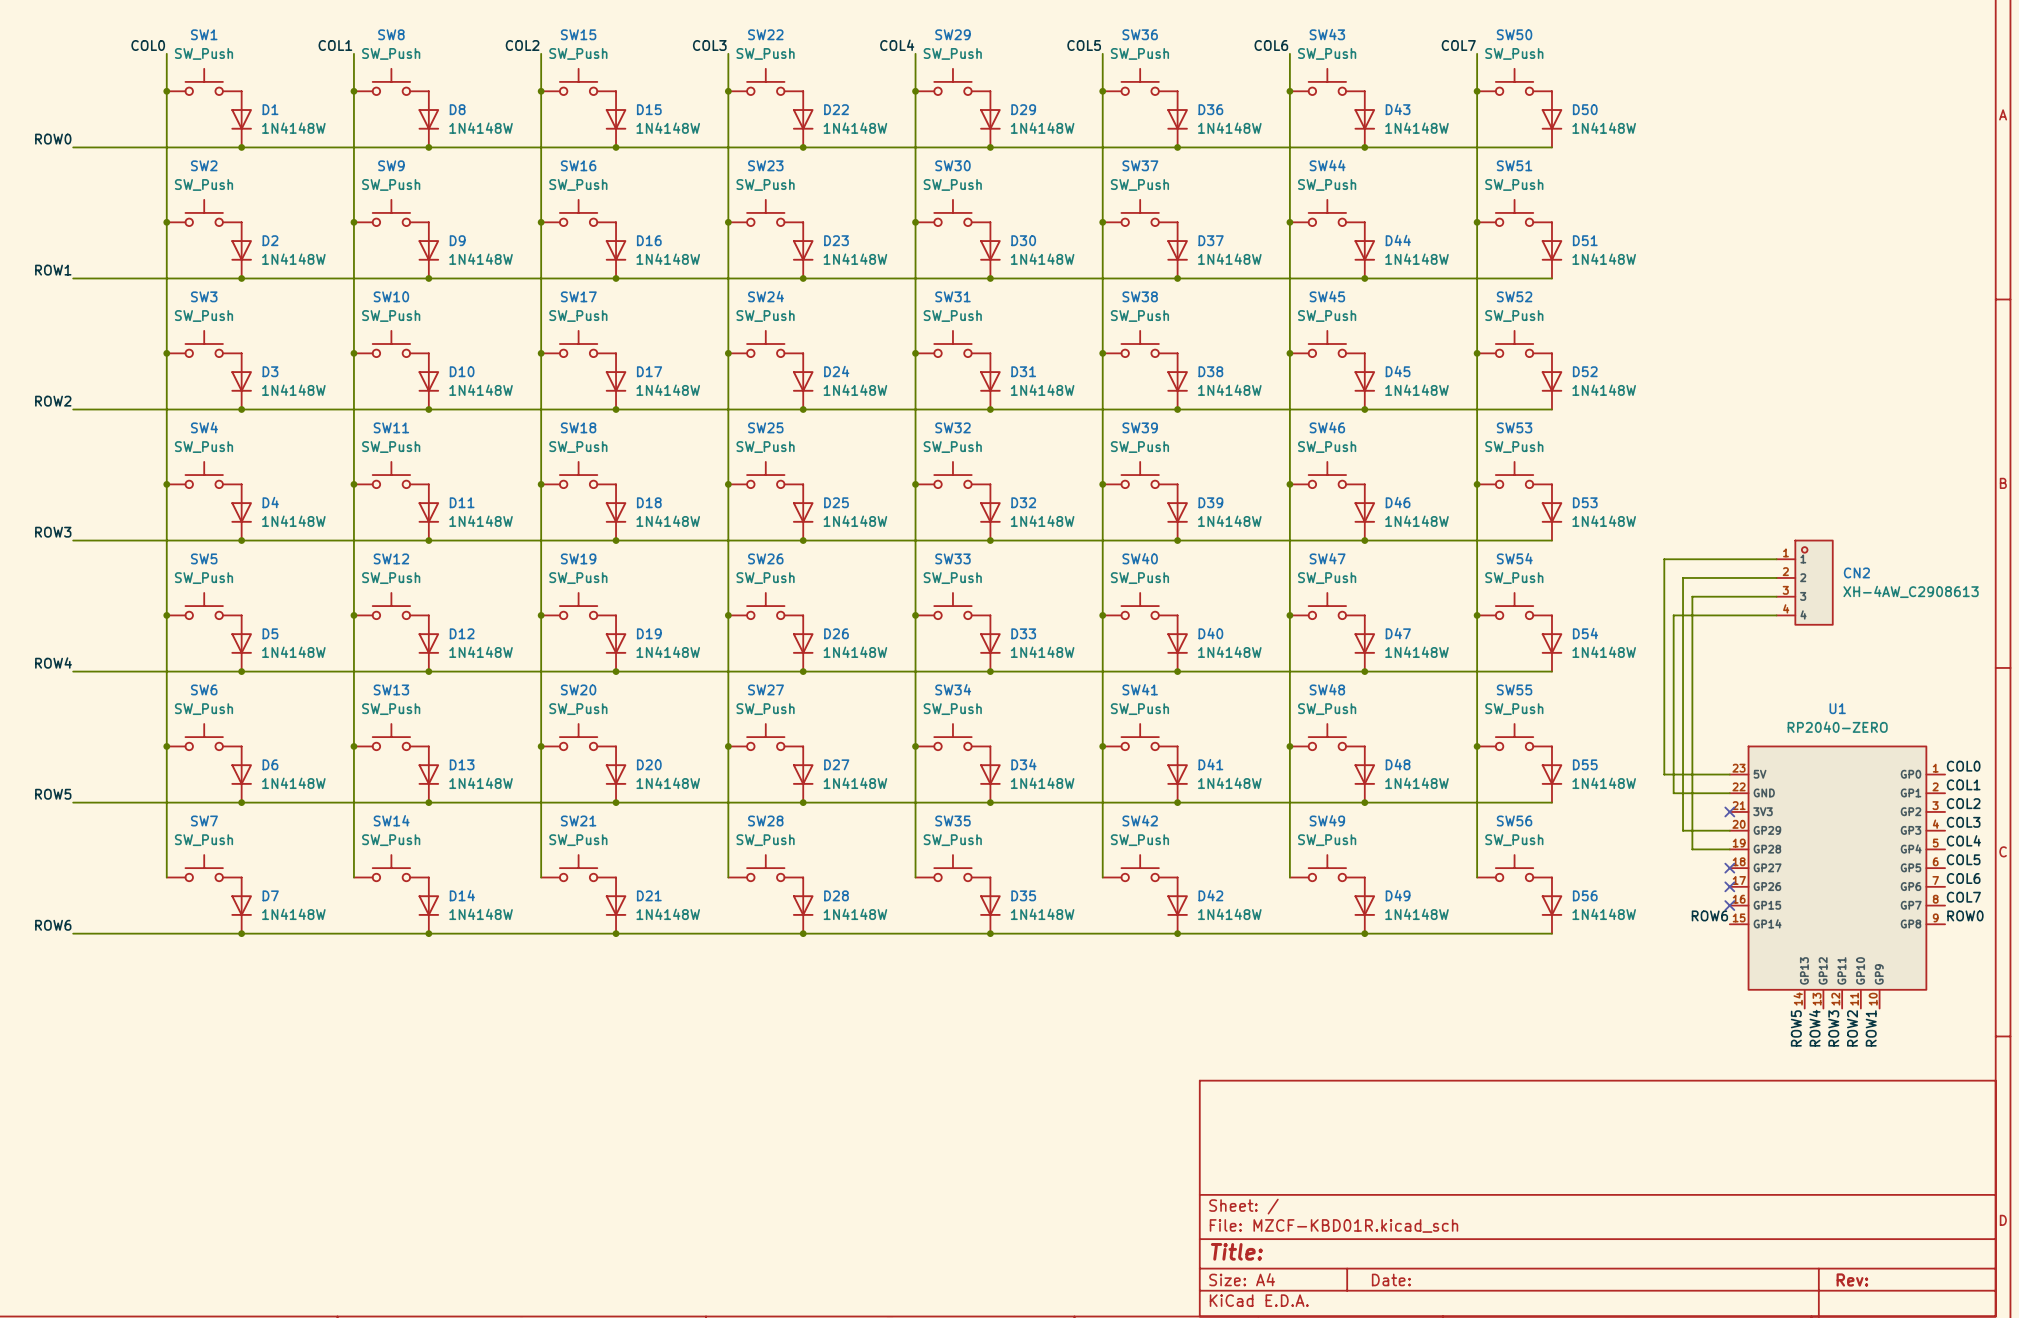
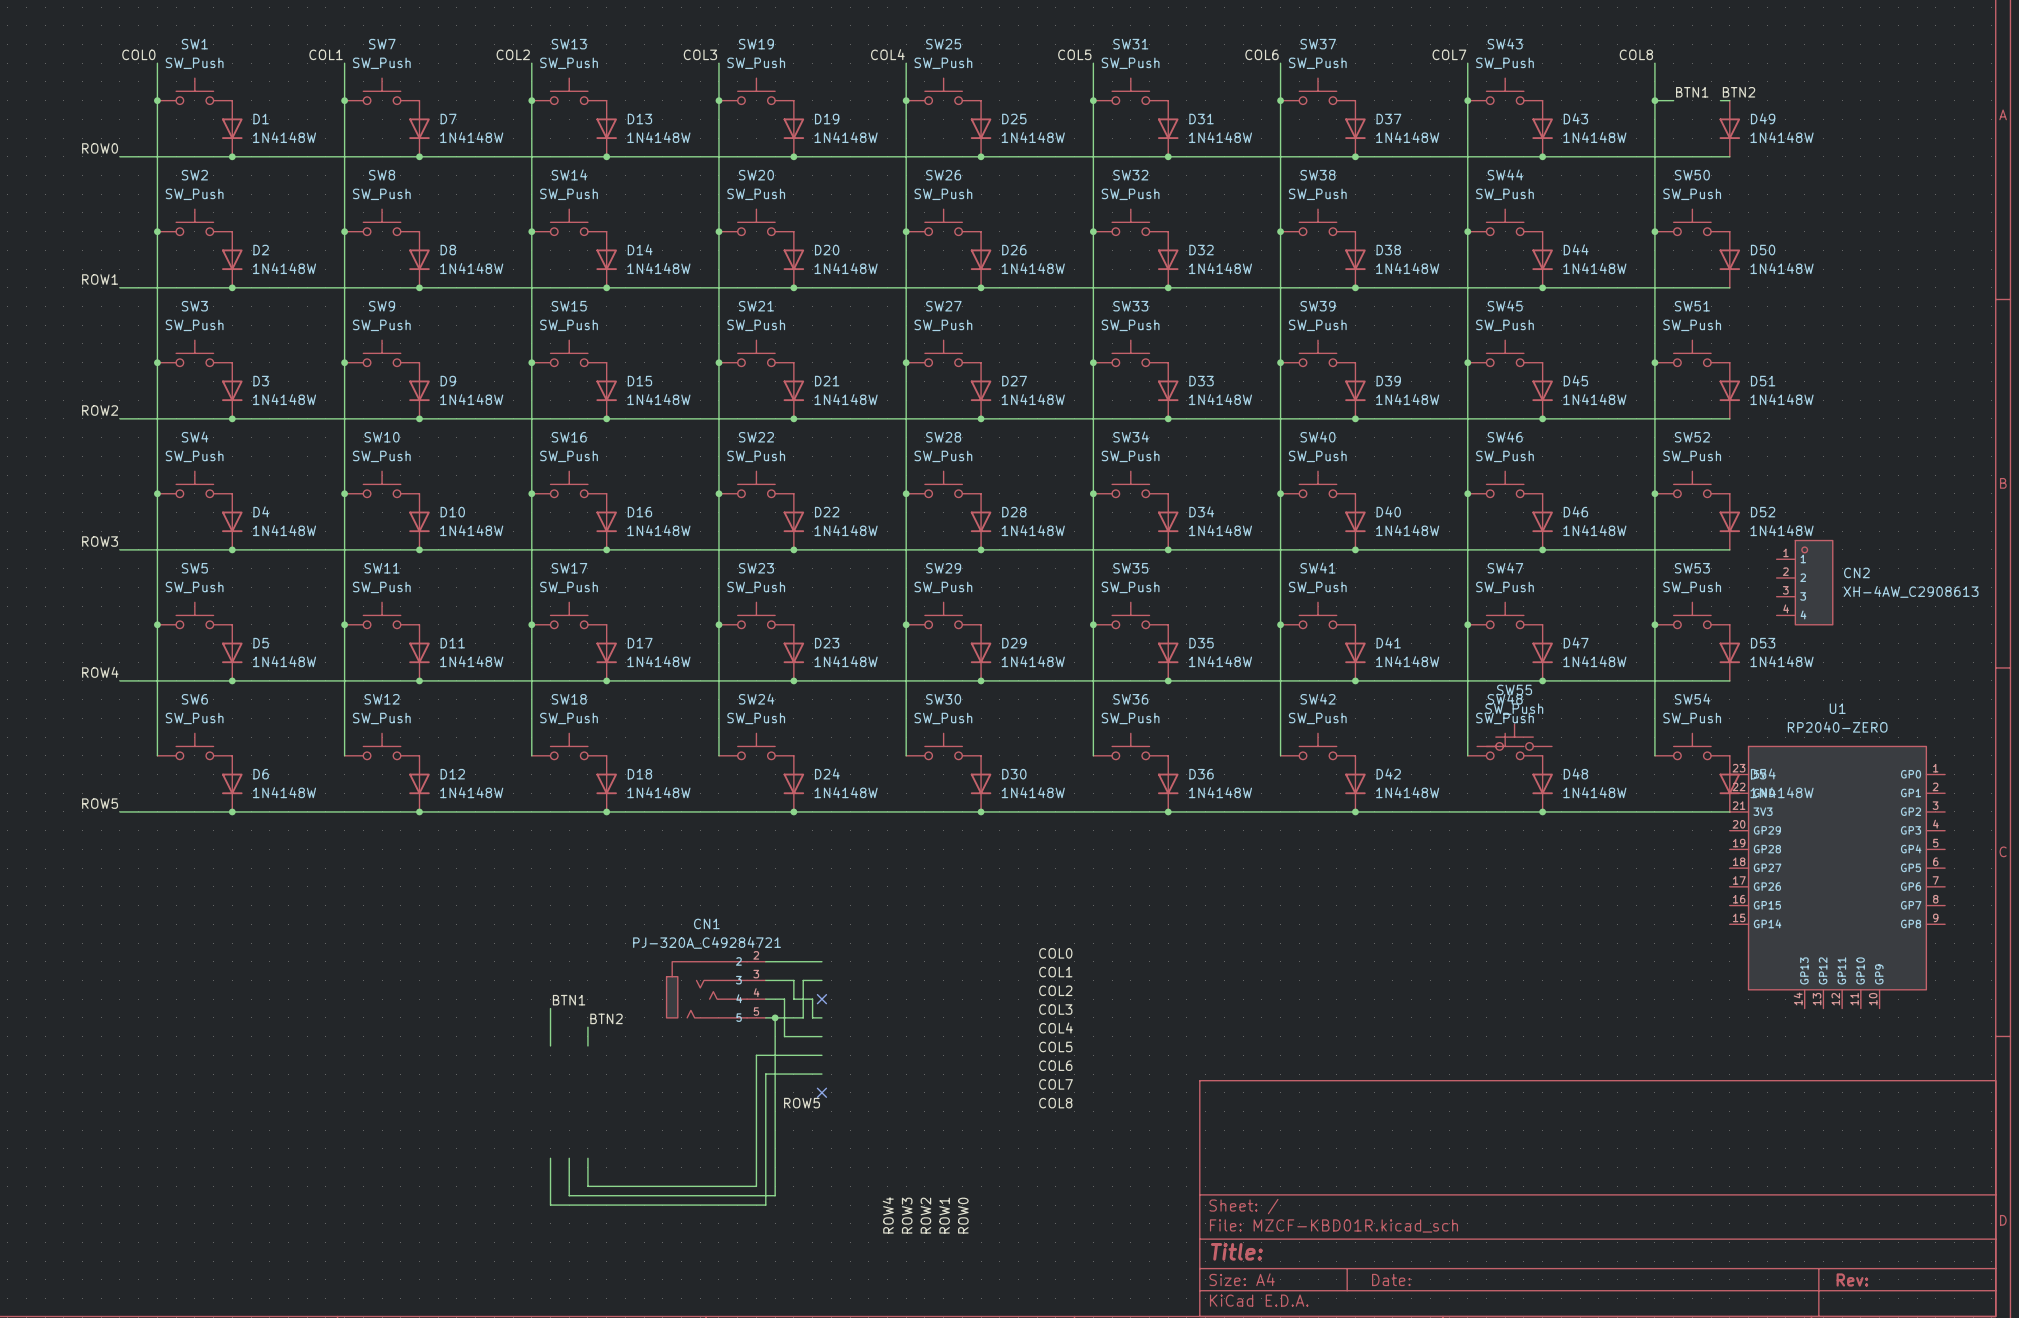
label position: COL0 (148, 45) -> COL0 (138, 54)
label position: COL1 (335, 45) -> COL1 (326, 54)
label position: COL2 (522, 45) -> COL2 (513, 54)
label position: COL3 (709, 45) -> COL3 (700, 54)
label position: COL4 (897, 45) -> COL4 (887, 54)
label position: COL5 (1084, 45) -> COL5 (1074, 54)
label position: COL6 (1271, 45) -> COL6 (1261, 54)
label position: COL7 (1458, 45) -> COL7 (1449, 54)
wire: (166, 53) (166, 877) -> none
wire: (353, 53) (353, 877) -> none
wire: (541, 53) (541, 877) -> none
wire: (728, 53) (728, 877) -> none
wire: (915, 53) (915, 877) -> none
wire: (1102, 53) (1102, 877) -> none
wire: (1289, 53) (1289, 877) -> none
wire: (1477, 53) (1477, 877) -> none
label: none -> COL8 (1636, 54)
wire: none -> (157, 63) (157, 755)
wire: none -> (344, 63) (344, 755)
wire: none -> (531, 63) (531, 755)
wire: none -> (718, 63) (718, 755)
wire: none -> (906, 63) (906, 755)
wire: none -> (1093, 63) (1093, 755)
wire: none -> (1280, 63) (1280, 755)
wire: none -> (1467, 63) (1467, 755)
wire: none -> (1654, 63) (1654, 755)
SW1 position: (204, 81) -> (194, 91)
SW8 position: (391, 81) -> (382, 222)
SW15 position: (578, 81) -> (569, 353)
SW22 position: (765, 81) -> (756, 484)
SW29 position: (952, 81) -> (943, 615)
SW36 position: (1140, 81) -> (1130, 746)
SW43 position: (1327, 81) -> (1505, 91)
SW50 position: (1514, 81) -> (1692, 222)
junction position: (166, 91) -> (157, 100)
junction position: (353, 91) -> (344, 100)
junction position: (541, 91) -> (531, 100)
junction position: (728, 91) -> (718, 100)
junction position: (915, 91) -> (906, 100)
junction position: (1102, 91) -> (1093, 100)
junction position: (1289, 91) -> (1280, 100)
junction position: (1477, 91) -> (1467, 100)
label: none -> BTN1 (1692, 92)
label: none -> BTN2 (1739, 92)
wire: none -> (1654, 100) (1673, 100)
junction: none -> (1654, 100)
wire: none -> (1720, 100) (1729, 100)
D1 position: (241, 119) -> (232, 128)
D8 position: (428, 119) -> (419, 259)
D15 position: (616, 119) -> (606, 390)
D22 position: (803, 119) -> (793, 521)
D29 position: (990, 119) -> (981, 652)
D36 position: (1177, 119) -> (1168, 783)
D43 position: (1364, 119) -> (1542, 128)
D50 position: (1551, 119) -> (1729, 259)
label position: ROW0 (53, 139) -> ROW0 (100, 148)
wire: (73, 147) (1551, 147) -> none
junction position: (241, 147) -> (232, 156)
junction position: (428, 147) -> (419, 156)
junction position: (616, 147) -> (606, 156)
junction position: (803, 147) -> (793, 156)
junction position: (990, 147) -> (981, 156)
junction position: (1177, 147) -> (1168, 156)
junction position: (1364, 147) -> (1355, 156)
wire: none -> (119, 156) (1729, 156)
junction: none -> (1542, 156)
SW2 position: (204, 212) -> (194, 222)
SW9 position: (391, 212) -> (382, 353)
SW16 position: (578, 212) -> (569, 484)
SW23 position: (765, 212) -> (756, 615)
SW30 position: (952, 212) -> (943, 746)
SW37 position: (1140, 212) -> (1318, 91)
SW44 position: (1327, 212) -> (1505, 222)
SW51 position: (1514, 212) -> (1692, 353)
junction position: (166, 222) -> (157, 231)
junction position: (353, 222) -> (344, 231)
junction position: (541, 222) -> (531, 231)
junction position: (728, 222) -> (718, 231)
junction position: (915, 222) -> (906, 231)
junction position: (1102, 222) -> (1093, 231)
junction position: (1289, 222) -> (1280, 231)
junction position: (1477, 222) -> (1467, 231)
junction: none -> (1654, 231)
D2 position: (241, 250) -> (232, 259)
D9 position: (428, 250) -> (419, 390)
D16 position: (616, 250) -> (606, 521)
D23 position: (803, 250) -> (793, 652)
D30 position: (990, 250) -> (981, 783)
D37 position: (1177, 250) -> (1355, 128)
D44 position: (1364, 250) -> (1542, 259)
D51 position: (1551, 250) -> (1729, 390)
label position: ROW1 (53, 270) -> ROW1 (100, 279)
wire: (73, 278) (1551, 278) -> none
junction position: (241, 278) -> (232, 287)
junction position: (428, 278) -> (419, 287)
junction position: (616, 278) -> (606, 287)
junction position: (803, 278) -> (793, 287)
junction position: (990, 278) -> (981, 287)
junction position: (1177, 278) -> (1168, 287)
junction position: (1364, 278) -> (1355, 287)
wire: none -> (119, 287) (1729, 287)
junction: none -> (1542, 287)
SW3 position: (204, 343) -> (194, 353)
SW10 position: (391, 343) -> (382, 484)
SW17 position: (578, 343) -> (569, 615)
SW24 position: (765, 343) -> (756, 746)
SW31 position: (952, 343) -> (1130, 91)
SW38 position: (1140, 343) -> (1318, 222)
SW45 position: (1327, 343) -> (1505, 353)
SW52 position: (1514, 343) -> (1692, 484)
junction position: (166, 353) -> (157, 362)
junction position: (353, 353) -> (344, 362)
junction position: (541, 353) -> (531, 362)
junction position: (728, 353) -> (718, 362)
junction position: (915, 353) -> (906, 362)
junction position: (1102, 353) -> (1093, 362)
junction position: (1289, 353) -> (1280, 362)
junction position: (1477, 353) -> (1467, 362)
junction: none -> (1654, 362)
D3 position: (241, 381) -> (232, 390)
D10 position: (428, 381) -> (419, 521)
D17 position: (616, 381) -> (606, 652)
D24 position: (803, 381) -> (793, 783)
D31 position: (990, 381) -> (1168, 128)
D38 position: (1177, 381) -> (1355, 259)
D45 position: (1364, 381) -> (1542, 390)
D52 position: (1551, 381) -> (1729, 521)
label position: ROW2 (53, 401) -> ROW2 (100, 410)
wire: (73, 409) (1551, 409) -> none
junction position: (241, 409) -> (232, 418)
junction position: (428, 409) -> (419, 418)
junction position: (616, 409) -> (606, 418)
junction position: (803, 409) -> (793, 418)
junction position: (990, 409) -> (981, 418)
junction position: (1177, 409) -> (1168, 418)
junction position: (1364, 409) -> (1355, 418)
wire: none -> (119, 418) (1729, 418)
junction: none -> (1542, 418)
SW4 position: (204, 475) -> (194, 484)
SW11 position: (391, 475) -> (382, 615)
SW18 position: (578, 475) -> (569, 746)
SW25 position: (765, 475) -> (943, 91)
SW32 position: (952, 475) -> (1130, 222)
SW39 position: (1140, 475) -> (1318, 353)
SW46 position: (1327, 475) -> (1505, 484)
SW53 position: (1514, 475) -> (1692, 615)
junction position: (166, 484) -> (157, 493)
junction position: (353, 484) -> (344, 493)
junction position: (541, 484) -> (531, 493)
junction position: (728, 484) -> (718, 493)
junction position: (915, 484) -> (906, 493)
junction position: (1102, 484) -> (1093, 493)
junction position: (1289, 484) -> (1280, 493)
junction position: (1477, 484) -> (1467, 493)
junction: none -> (1654, 493)
D4 position: (241, 512) -> (232, 521)
D11 position: (428, 512) -> (419, 652)
D18 position: (616, 512) -> (606, 783)
D25 position: (803, 512) -> (981, 128)
D32 position: (990, 512) -> (1168, 259)
D39 position: (1177, 512) -> (1355, 390)
D46 position: (1364, 512) -> (1542, 521)
D53 position: (1551, 512) -> (1729, 652)
label position: ROW3 (53, 532) -> ROW3 (100, 541)
wire: (73, 540) (1551, 540) -> none
junction position: (241, 540) -> (232, 549)
junction position: (428, 540) -> (419, 549)
junction position: (616, 540) -> (606, 549)
junction position: (803, 540) -> (793, 549)
junction position: (990, 540) -> (981, 549)
junction position: (1177, 540) -> (1168, 549)
junction position: (1364, 540) -> (1355, 549)
wire: none -> (119, 549) (1729, 549)
junction: none -> (1542, 549)
wire: (1776, 559) (1664, 559) (1664, 774) (1729, 774) -> none
wire: (1776, 577) (1683, 577) (1683, 830) (1729, 830) -> none
wire: (1776, 596) (1692, 596) (1692, 849) (1729, 849) -> none
SW5 position: (204, 606) -> (194, 615)
SW12 position: (391, 606) -> (382, 746)
SW19 position: (578, 606) -> (756, 91)
SW26 position: (765, 606) -> (943, 222)
SW33 position: (952, 606) -> (1130, 353)
SW40 position: (1140, 606) -> (1318, 484)
SW47 position: (1327, 606) -> (1505, 615)
SW54 position: (1514, 606) -> (1692, 746)
junction position: (166, 615) -> (157, 624)
junction position: (353, 615) -> (344, 624)
junction position: (541, 615) -> (531, 624)
junction position: (728, 615) -> (718, 624)
junction position: (915, 615) -> (906, 624)
junction position: (1102, 615) -> (1093, 624)
junction position: (1289, 615) -> (1280, 624)
junction position: (1477, 615) -> (1467, 624)
wire: (1776, 615) (1673, 615) (1673, 793) (1729, 793) -> none
junction: none -> (1654, 624)
D5 position: (241, 643) -> (232, 652)
D12 position: (428, 643) -> (419, 783)
D19 position: (616, 643) -> (793, 128)
D26 position: (803, 643) -> (981, 259)
D33 position: (990, 643) -> (1168, 390)
D40 position: (1177, 643) -> (1355, 521)
D47 position: (1364, 643) -> (1542, 652)
D54 position: (1551, 643) -> (1729, 783)
label position: ROW4 (53, 663) -> ROW4 (100, 672)
wire: (73, 671) (1551, 671) -> none
junction position: (241, 671) -> (232, 680)
junction position: (428, 671) -> (419, 680)
junction position: (616, 671) -> (606, 680)
junction position: (803, 671) -> (793, 680)
junction position: (990, 671) -> (981, 680)
junction position: (1177, 671) -> (1168, 680)
junction position: (1364, 671) -> (1355, 680)
wire: none -> (119, 680) (1729, 680)
junction: none -> (1542, 680)
SW6 position: (204, 737) -> (194, 746)
SW13 position: (391, 737) -> (569, 91)
SW20 position: (578, 737) -> (756, 222)
SW27 position: (765, 737) -> (943, 353)
SW34 position: (952, 737) -> (1130, 484)
SW41 position: (1140, 737) -> (1318, 615)
SW48 position: (1327, 737) -> (1505, 746)
junction: (166, 746) -> none
junction: (353, 746) -> none
junction: (541, 746) -> none
junction: (728, 746) -> none
junction: (915, 746) -> none
junction: (1102, 746) -> none
junction: (1289, 746) -> none
junction: (1477, 746) -> none
label: COL0 (1963, 766) -> none
D6 position: (241, 774) -> (232, 783)
D13 position: (428, 774) -> (606, 128)
D20 position: (616, 774) -> (793, 259)
D27 position: (803, 774) -> (981, 390)
D34 position: (990, 774) -> (1168, 521)
D41 position: (1177, 774) -> (1355, 652)
D48 position: (1364, 774) -> (1542, 783)
D55: 1N4148W (1551, 774) -> none
label: COL1 (1963, 784) -> none
label position: ROW5 (53, 794) -> ROW5 (100, 803)
wire: (73, 802) (1551, 802) -> none
junction position: (241, 802) -> (232, 811)
junction position: (428, 802) -> (419, 811)
junction position: (616, 802) -> (606, 811)
junction position: (803, 802) -> (793, 811)
junction position: (990, 802) -> (981, 811)
junction position: (1177, 802) -> (1168, 811)
junction position: (1364, 802) -> (1355, 811)
label: COL2 (1963, 803) -> none
wire: none -> (119, 811) (1729, 811)
junction: none -> (1542, 811)
no-connect mark: (1729, 811) -> none
label: COL3 (1963, 822) -> none
label: COL4 (1963, 840) -> none
label: COL5 (1963, 859) -> none
SW7 position: (204, 868) -> (382, 91)
SW14 position: (391, 868) -> (569, 222)
SW21 position: (578, 868) -> (756, 353)
SW28 position: (765, 868) -> (943, 484)
SW35 position: (952, 868) -> (1130, 615)
SW42 position: (1140, 868) -> (1318, 746)
SW49: SW_Push (1327, 868) -> none
SW56: SW_Push (1514, 868) -> none
no-connect mark: (1729, 868) -> none
label: COL6 (1963, 878) -> none
no-connect mark: (1729, 886) -> none
label: COL7 (1963, 897) -> none
D7 position: (241, 905) -> (419, 128)
D14 position: (428, 905) -> (606, 259)
D21 position: (616, 905) -> (793, 390)
D28 position: (803, 905) -> (981, 521)
D35 position: (990, 905) -> (1168, 652)
D42 position: (1177, 905) -> (1355, 783)
D49 position: (1364, 905) -> (1729, 128)
D56: 1N4148W (1551, 905) -> none
no-connect mark: (1729, 905) -> none
label: ROW6 (1709, 915) -> none
label: ROW0 (1965, 915) -> none
label: ROW6 (53, 925) -> none
wire: (73, 933) (1551, 933) -> none
junction: (241, 933) -> none
junction: (428, 933) -> none
junction: (616, 933) -> none
junction: (803, 933) -> none
junction: (990, 933) -> none
junction: (1177, 933) -> none
junction: (1364, 933) -> none
label: none -> COL0 (1055, 953)
wire: none -> (765, 961) (821, 961)
label: none -> COL1 (1055, 972)
wire: none -> (765, 980) (793, 980) (793, 999) (812, 999) (812, 1017) (821, 1017)
wire: none -> (821, 980) (803, 980) (803, 1017) (765, 1017)
CN1: none -> PJ-320A_C49284721 (716, 989)
label: none -> COL2 (1055, 990)
wire: none -> (765, 999) (784, 999) (784, 1036) (821, 1036)
no-connect mark: none -> (821, 999)
label: none -> BTN1 (569, 1000)
wire: none -> (550, 1008) (550, 1045)
label: none -> COL3 (1055, 1009)
wire: none -> (775, 1017) (775, 1195) (569, 1195) (569, 1158)
junction: none -> (775, 1017)
label: none -> BTN2 (606, 1018)
wire: none -> (587, 1027) (587, 1045)
label: none -> COL4 (1056, 1028)
label: ROW5 (1796, 1028) -> none
label: ROW4 (1814, 1028) -> none
label: ROW3 (1833, 1028) -> none
label: ROW2 (1852, 1028) -> none
label: ROW1 (1871, 1028) -> none
label: none -> COL5 (1055, 1046)
wire: none -> (821, 1055) (756, 1055) (756, 1186) (587, 1186) (587, 1158)
label: none -> COL6 (1055, 1065)
wire: none -> (821, 1074) (765, 1074) (765, 1205) (550, 1205) (550, 1158)
label: none -> COL7 (1056, 1084)
no-connect mark: none -> (821, 1092)
label: none -> ROW5 (802, 1103)
label: none -> COL8 (1055, 1103)
label: none -> ROW4 (888, 1215)
label: none -> ROW3 (907, 1215)
label: none -> ROW2 (925, 1215)
label: none -> ROW1 (944, 1215)
label: none -> ROW0 (963, 1215)

